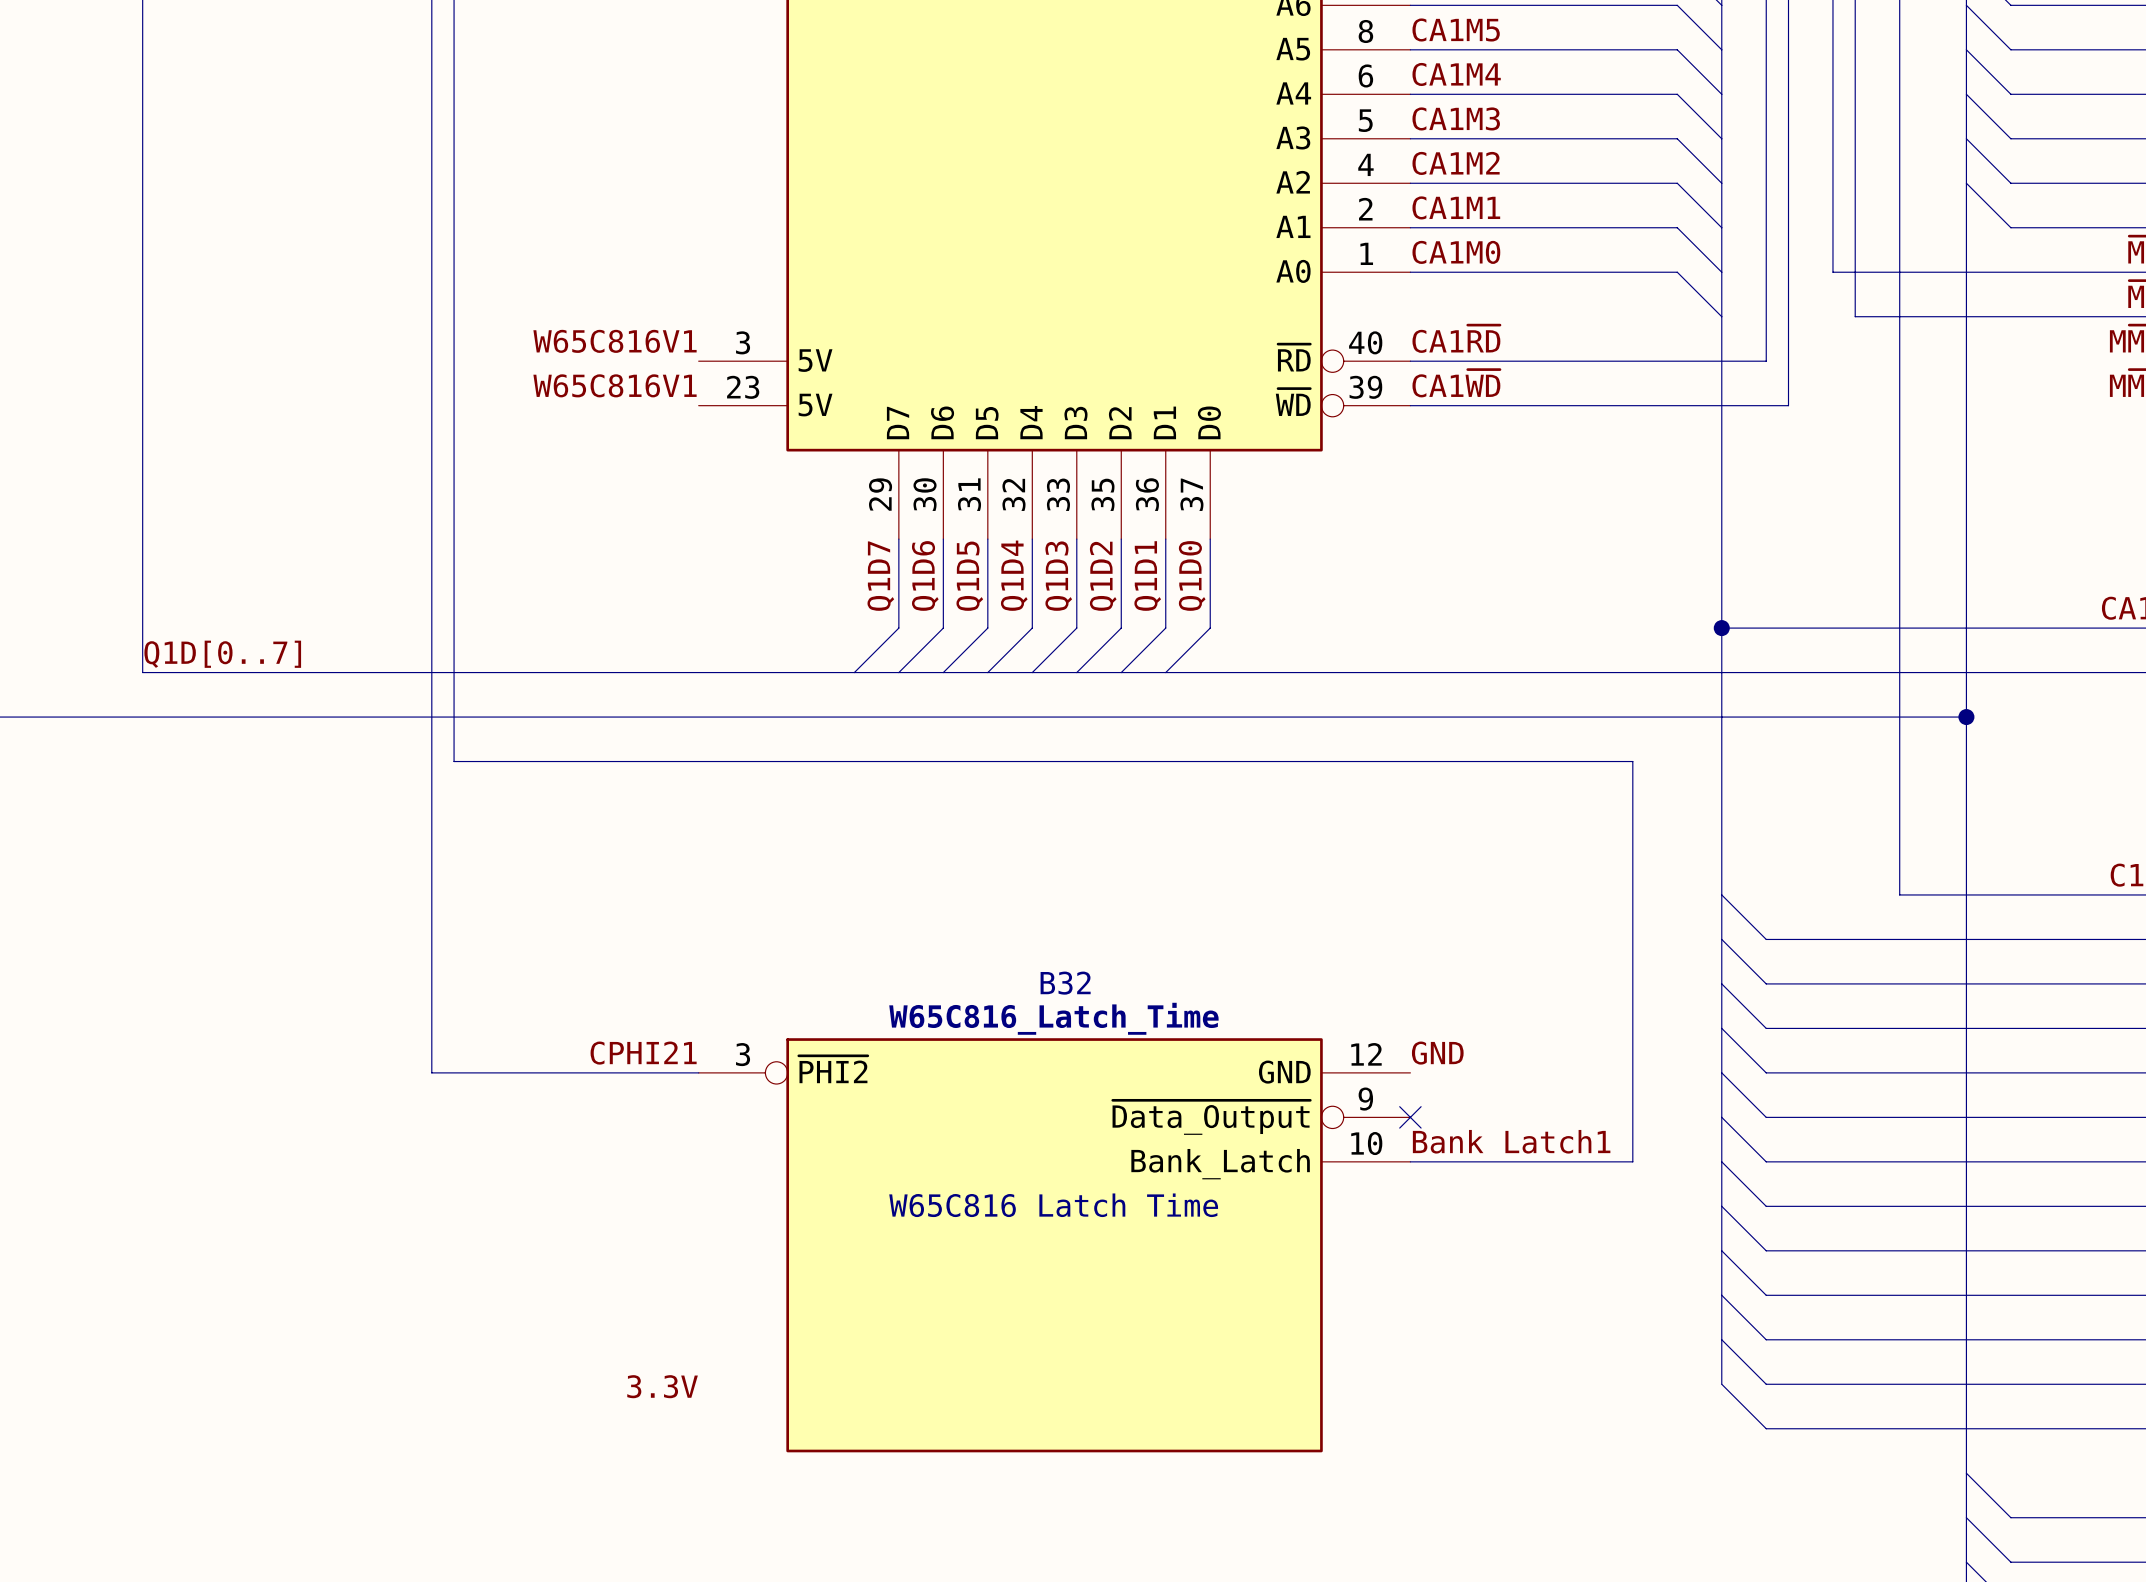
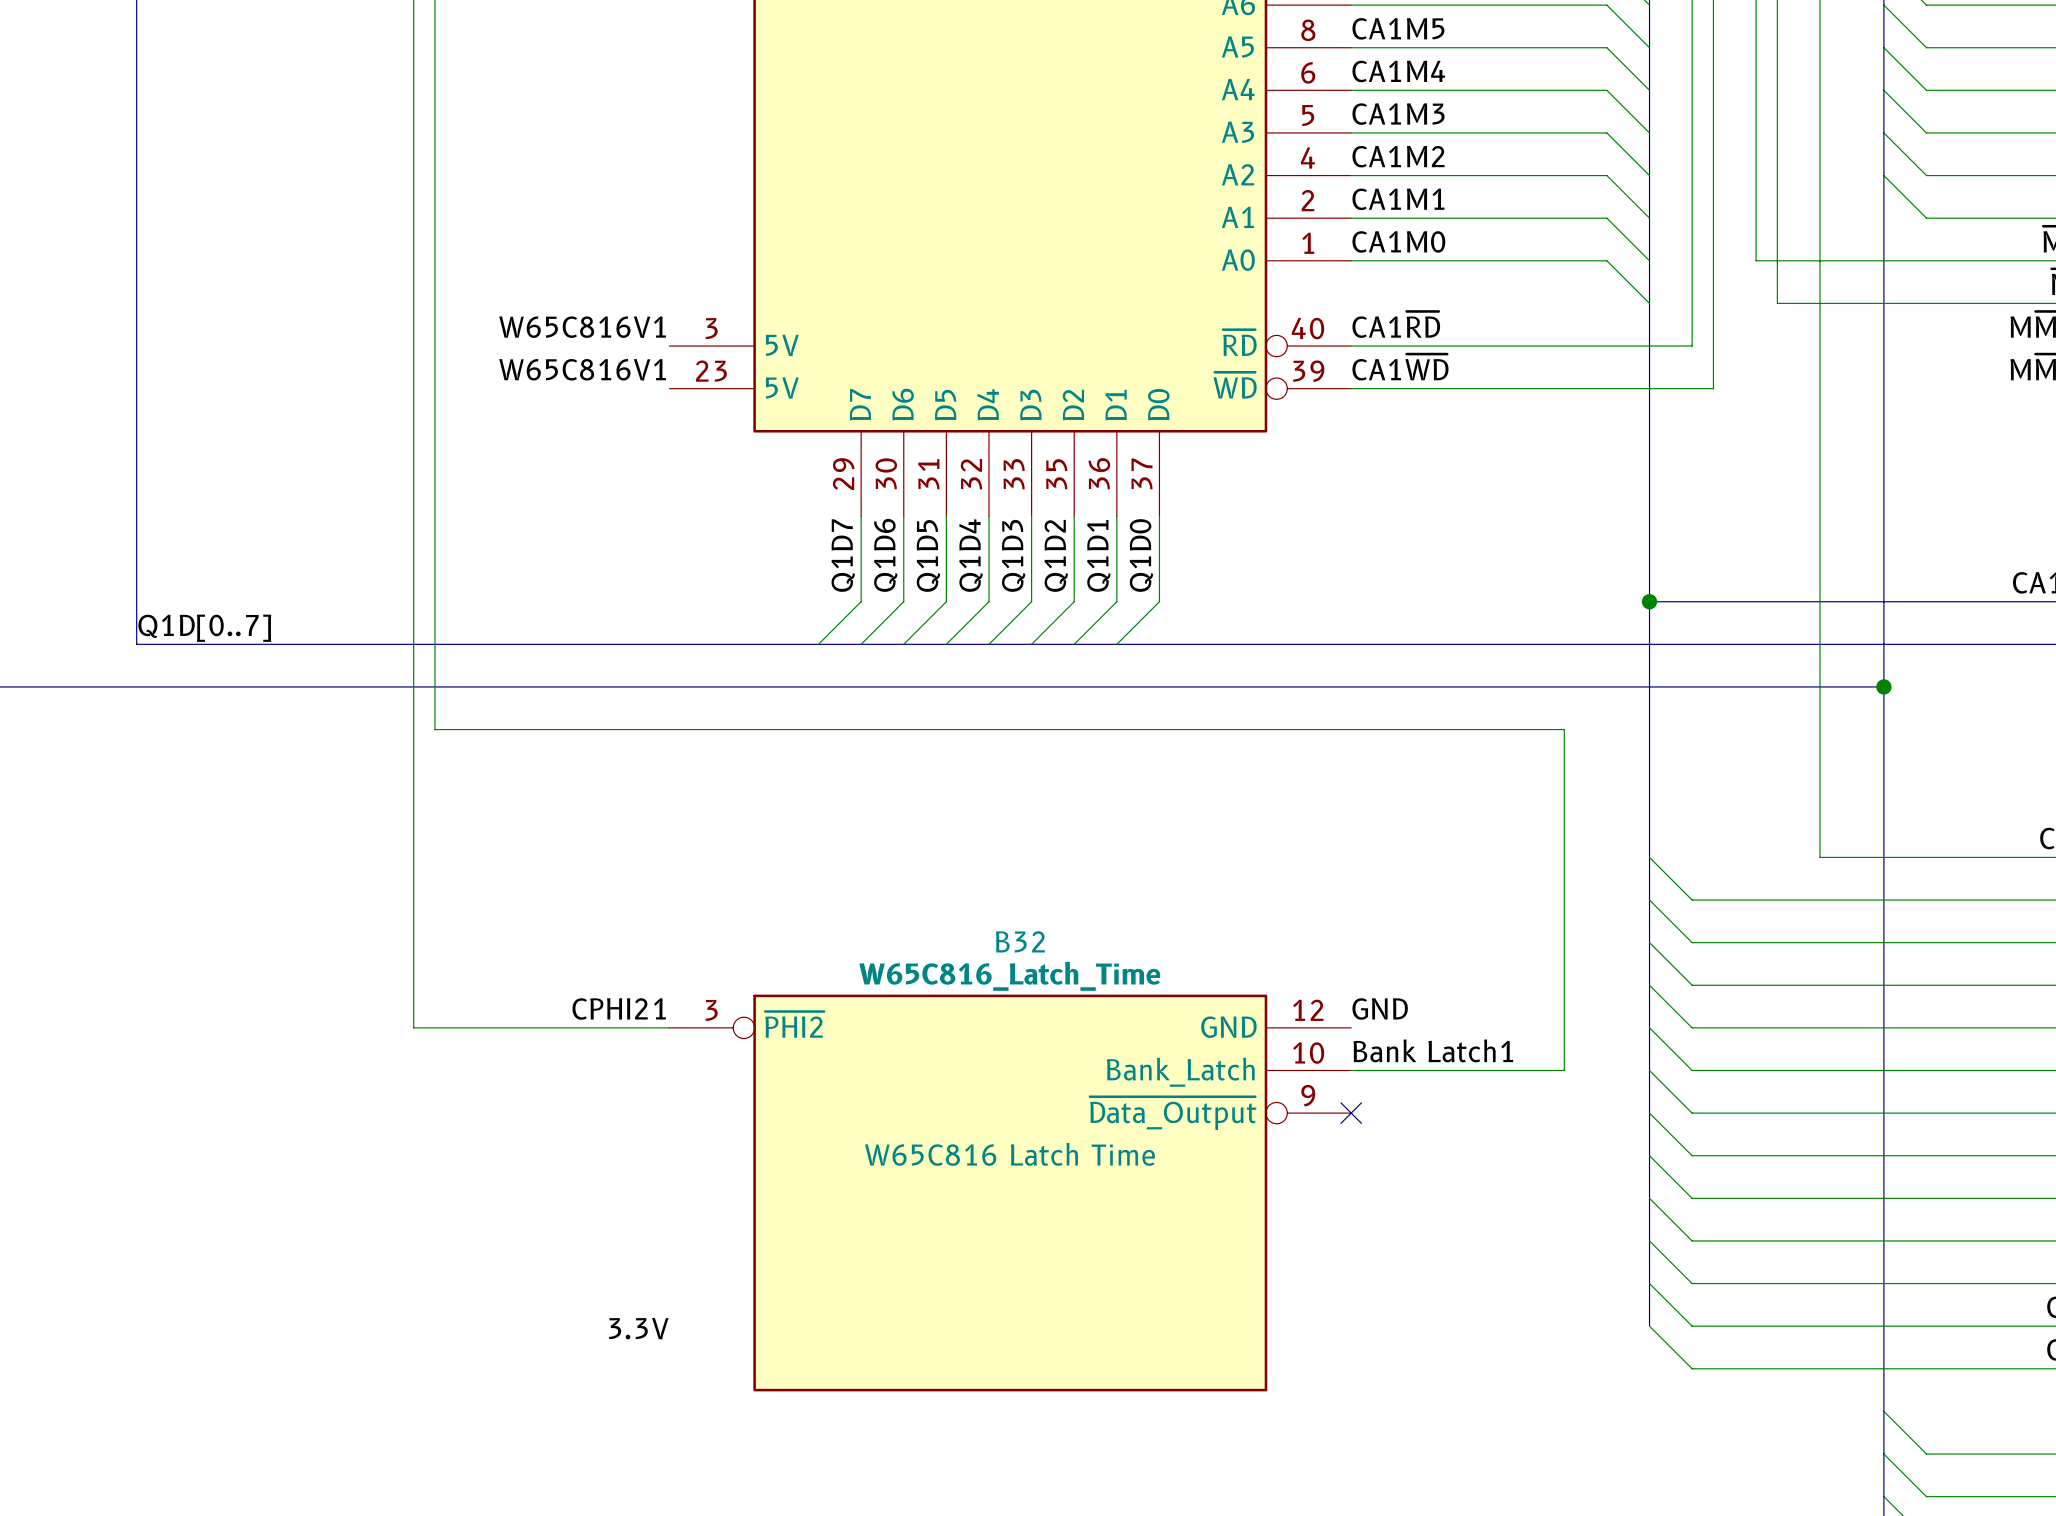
B32 symbol: [698, 1038, 1411, 1453] -> [669, 994, 1352, 1392]
no-connect mark position: (1410, 1117) -> (1351, 1113)
wire: (1632, 1117) (1632, 1161) (1410, 1161) -> (1564, 1070) (1351, 1070)
label position: Bank Latch1 (1511, 1141) -> Bank Latch1 (1433, 1050)

